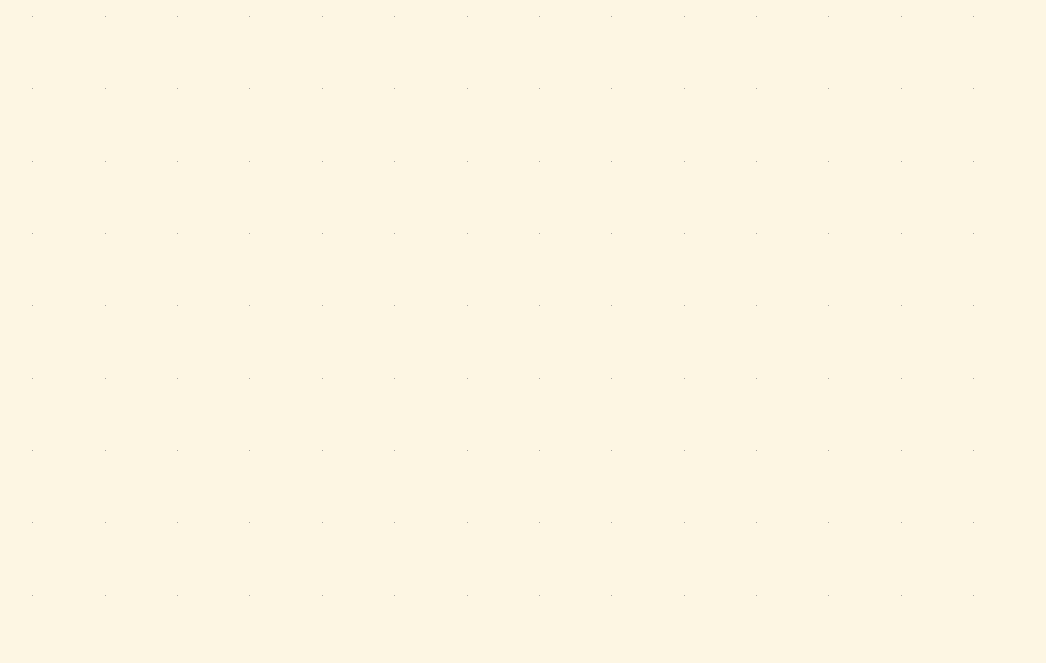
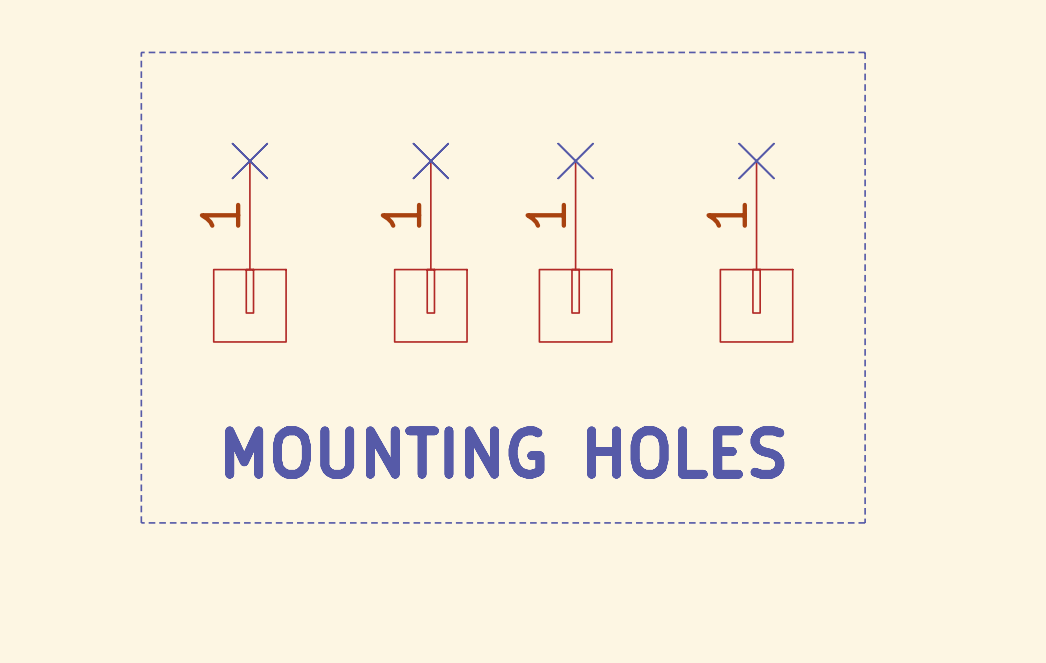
line: none -> (141, 52) (865, 52) (865, 522) (141, 522) (141, 52)
no-connect mark: none -> (249, 161)
no-connect mark: none -> (430, 161)
no-connect mark: none -> (575, 161)
no-connect mark: none -> (756, 161)
part: none -> (249, 251)
part: none -> (430, 251)
part: none -> (575, 251)
part: none -> (756, 251)
text: none -> MOUNTING HOLES (504, 452)

